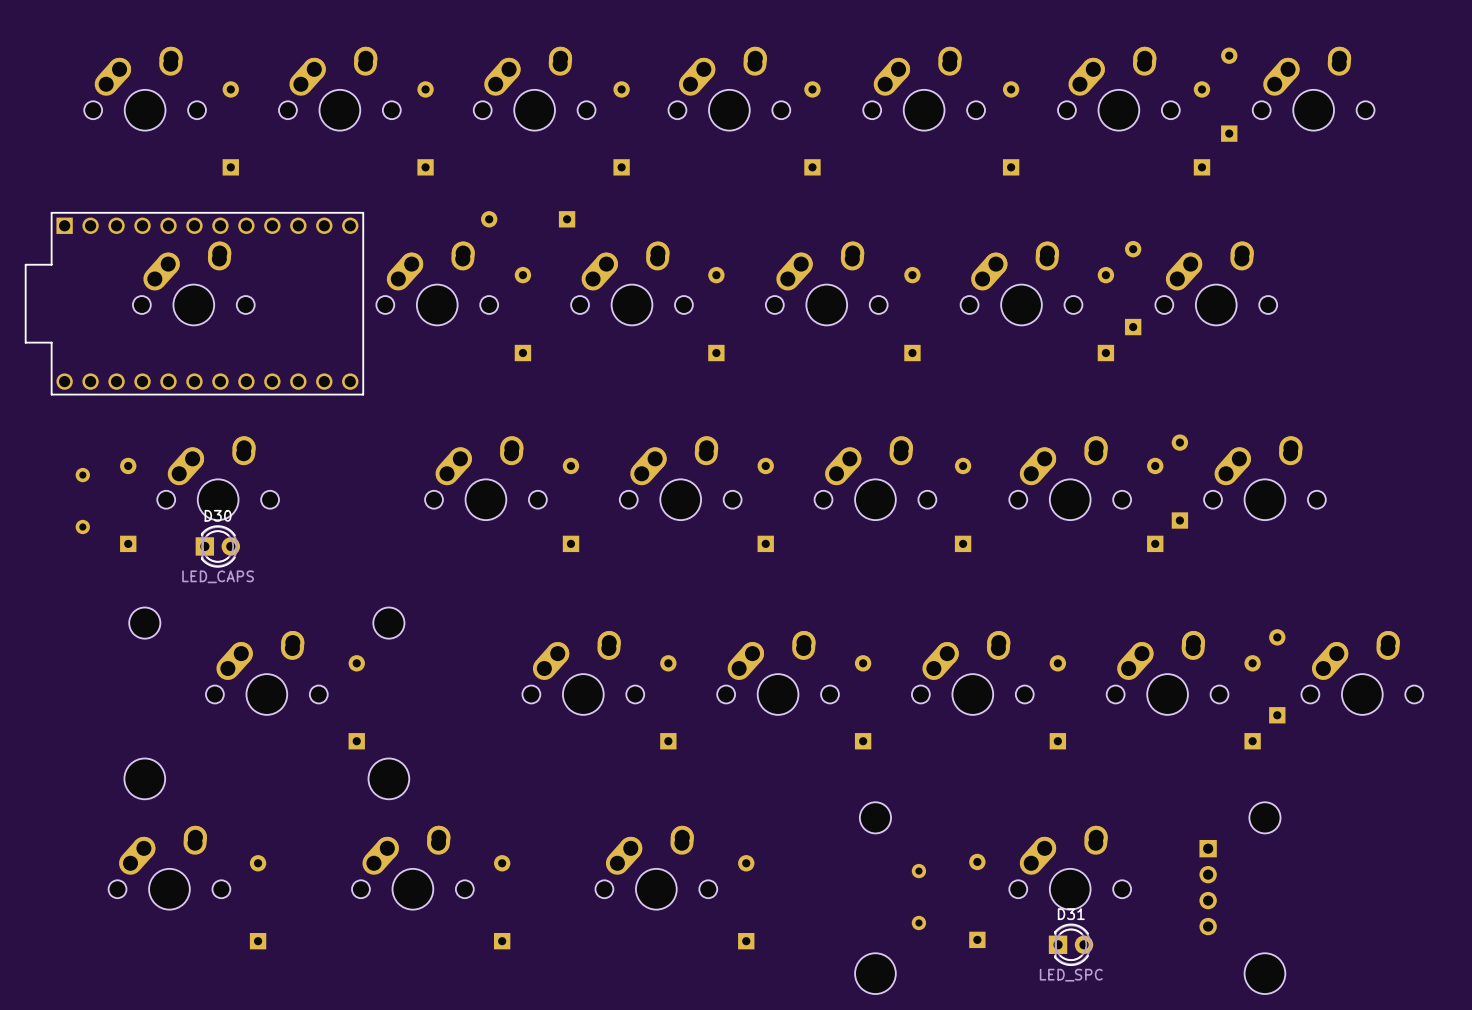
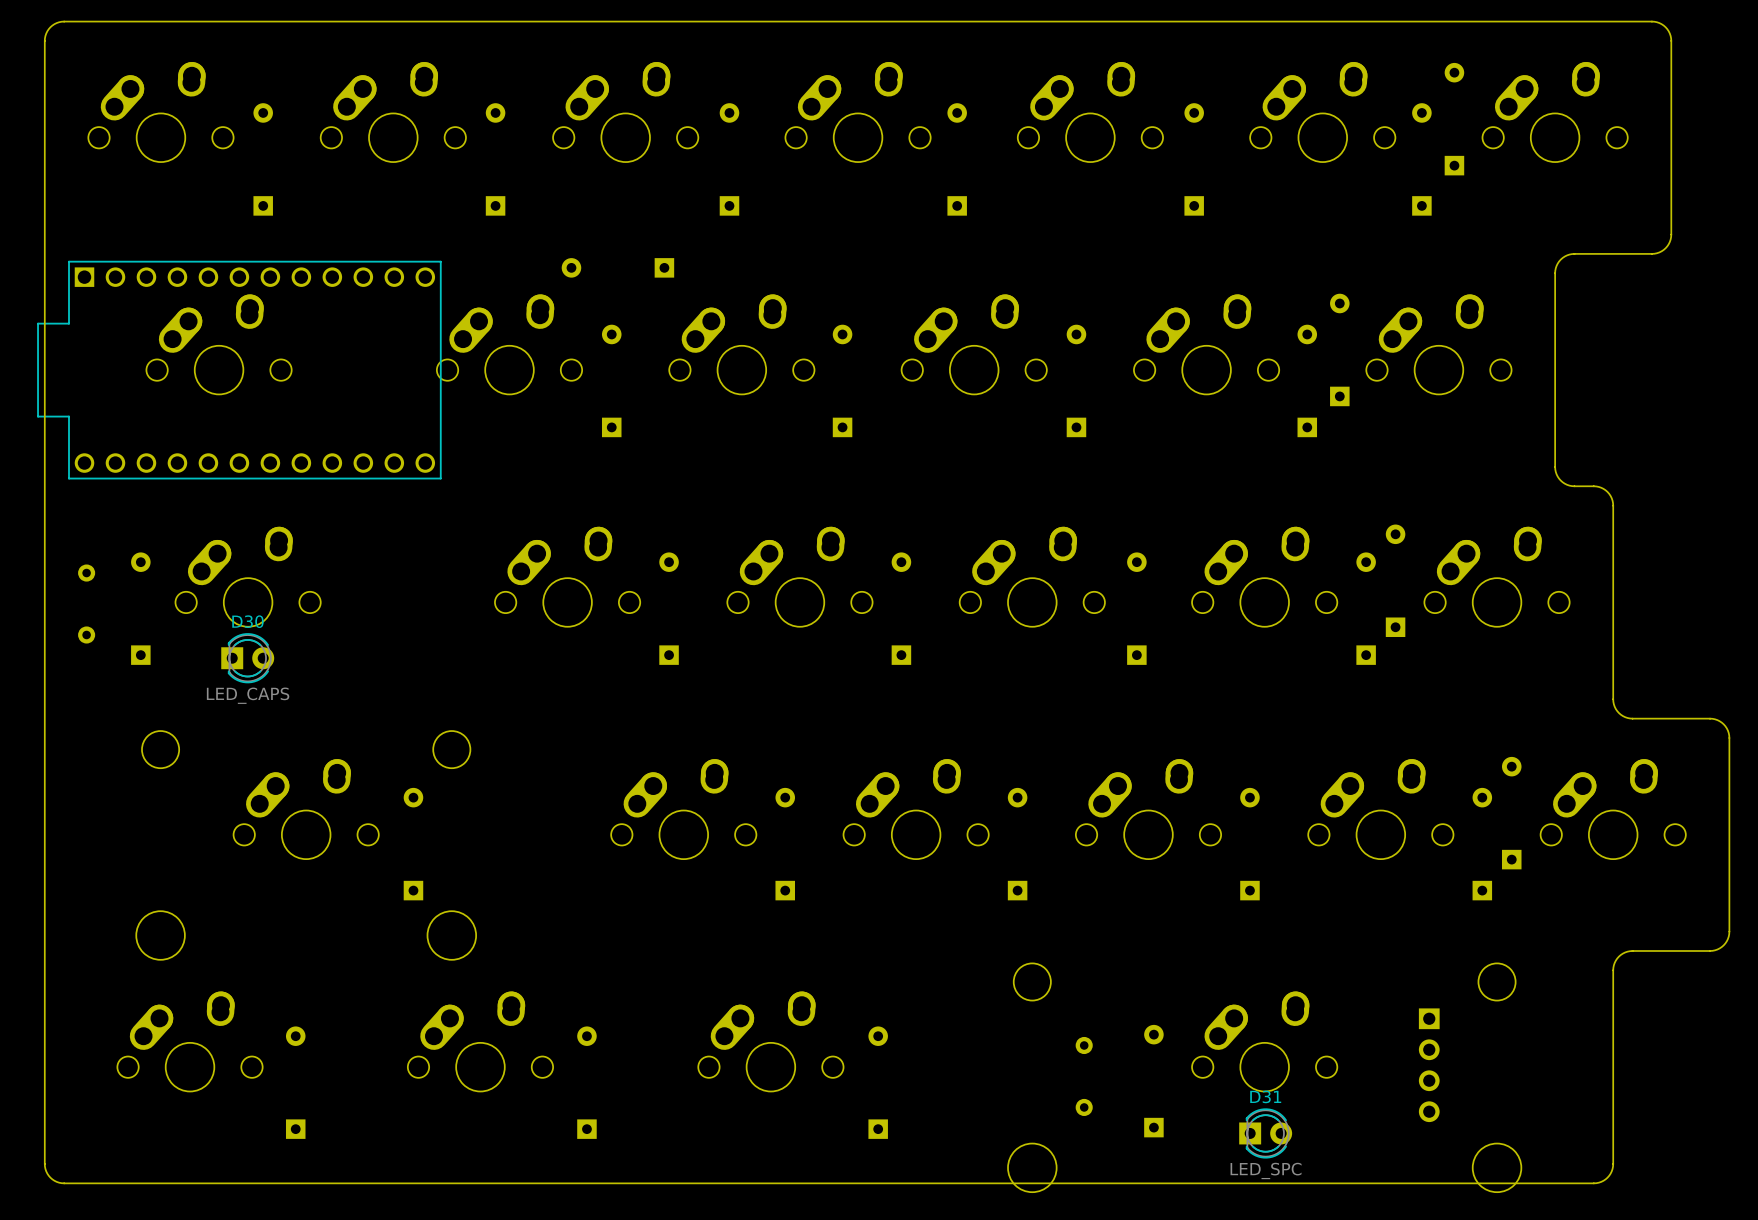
board edge: none -> (64, 21) (1651, 21) (1663, 25) (1669, 33) (1671, 40) (1670, 239) (1665, 248) (1656, 253) (1571, 254) (1562, 257) (1557, 263) (1555, 273) (1555, 469) (1557, 476) (1564, 483) (1571, 486) (1601, 487) (1607, 491) (1612, 500) (1613, 699) (1615, 708) (1622, 716) (1630, 718) (1712, 718) (1721, 722) (1727, 730) (1729, 931) (1725, 943) (1715, 950) (1630, 951) (1620, 955) (1614, 962) (1613, 1163) (1609, 1175) (1601, 1181) (1593, 1183) (64, 1183) (52, 1179) (46, 1171) (44, 1163) (44, 40) (50, 27) (64, 21)
part position: (194, 303) -> (239, 370)

